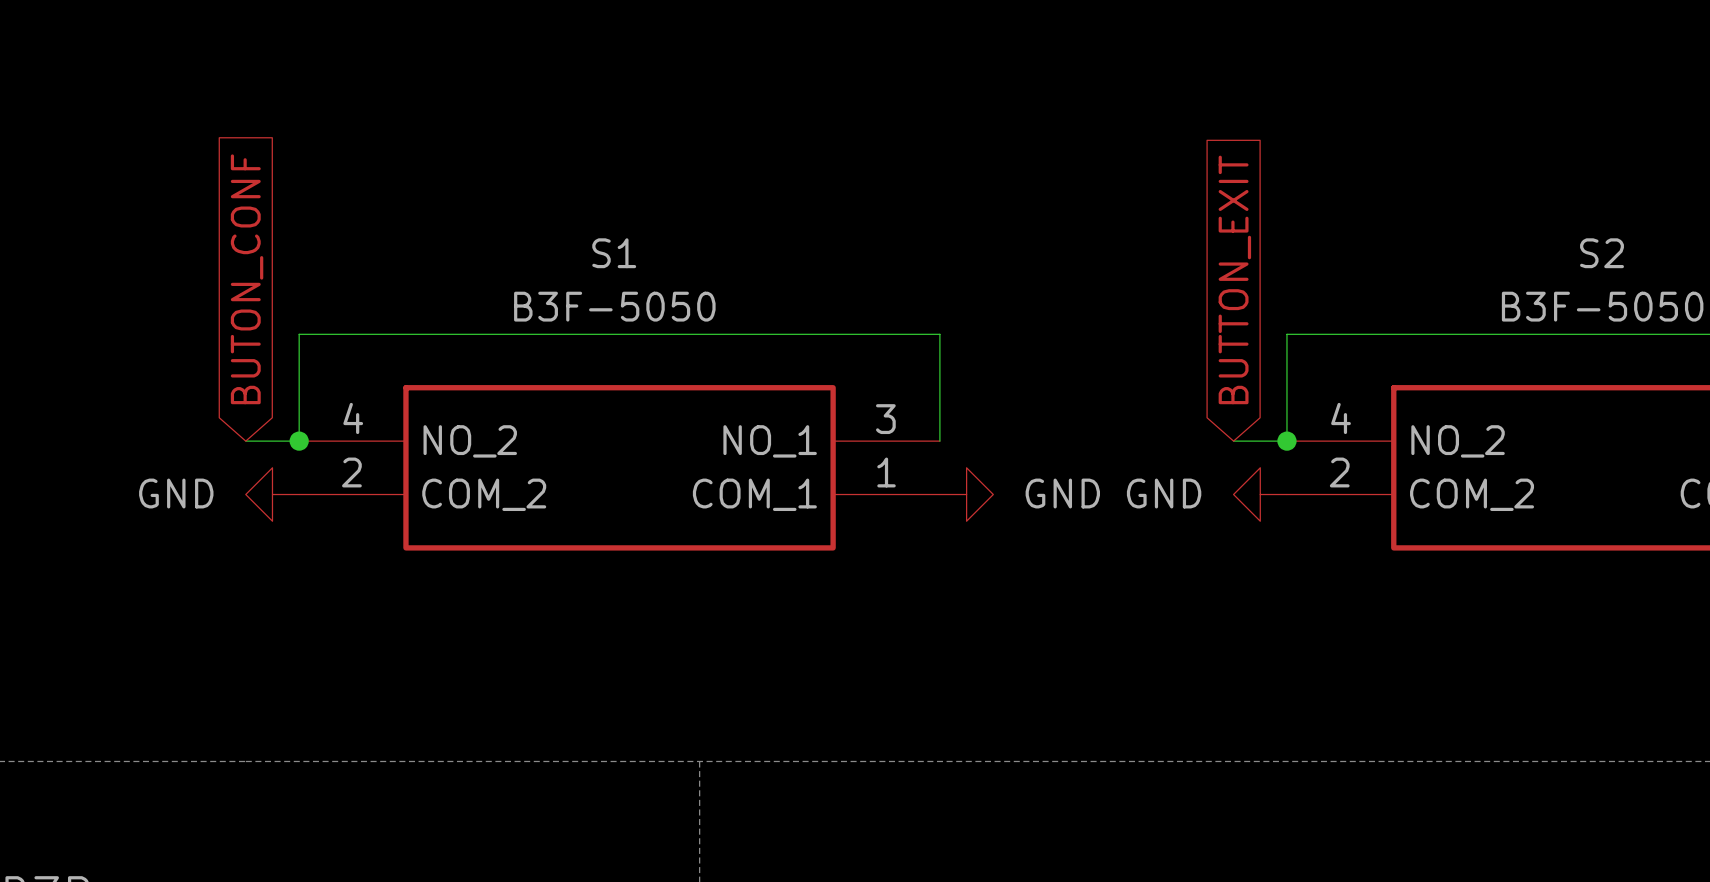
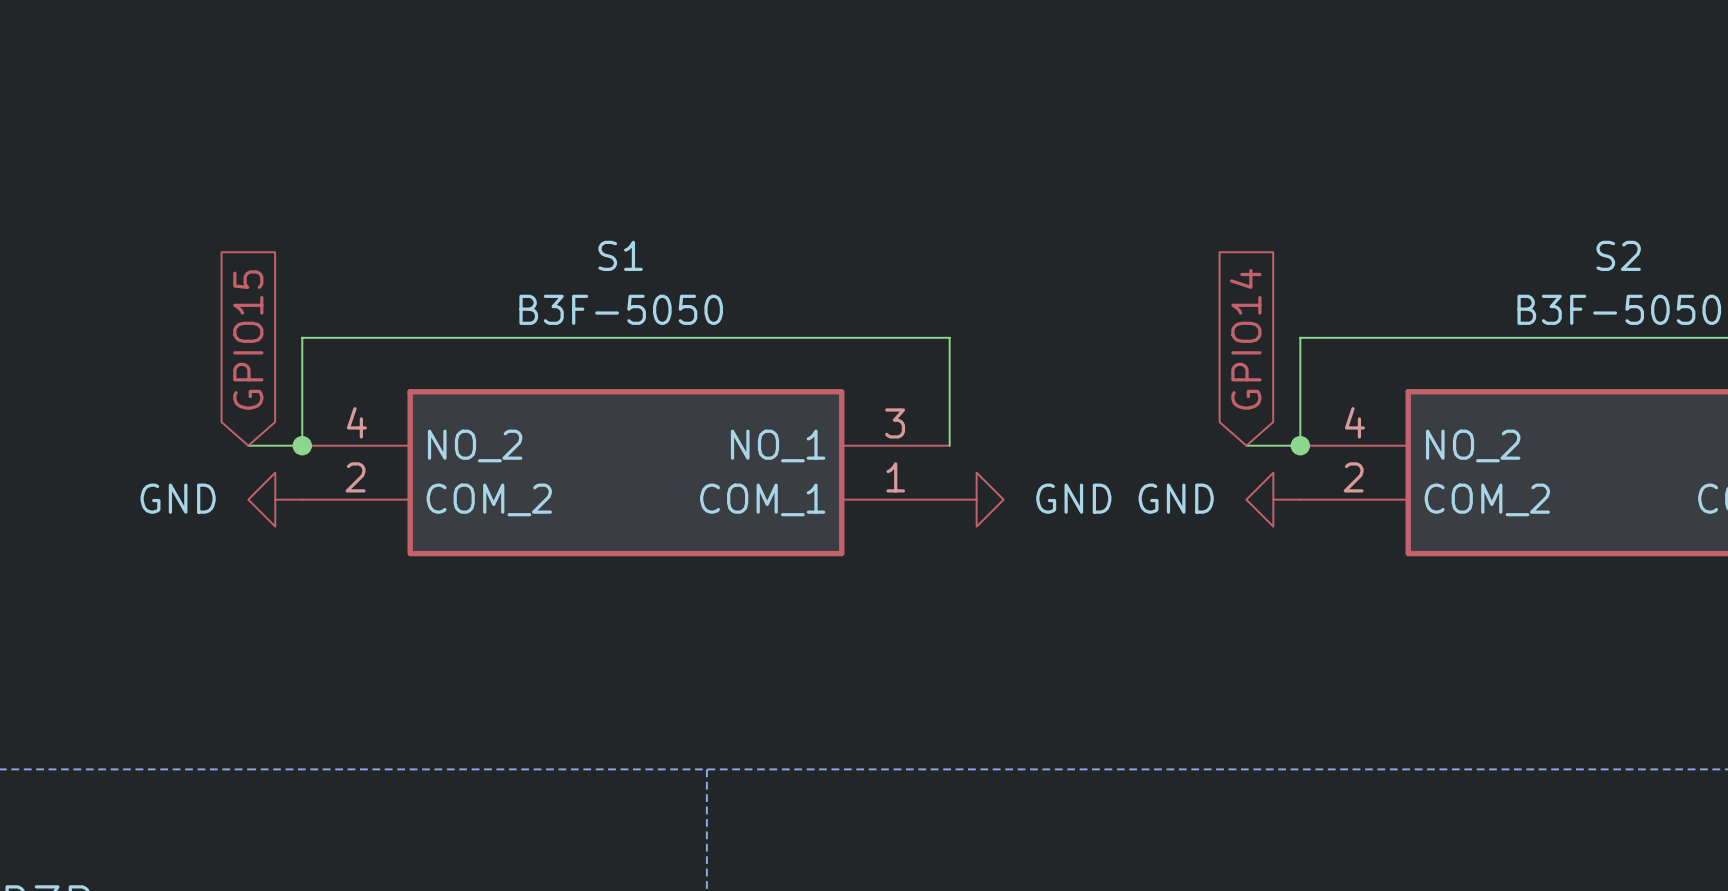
global label: BUTON_CONF (247, 279) -> GPIO15 (248, 340)
global label: BUTTON_EXIT (1234, 279) -> GPIO14 (1245, 339)

